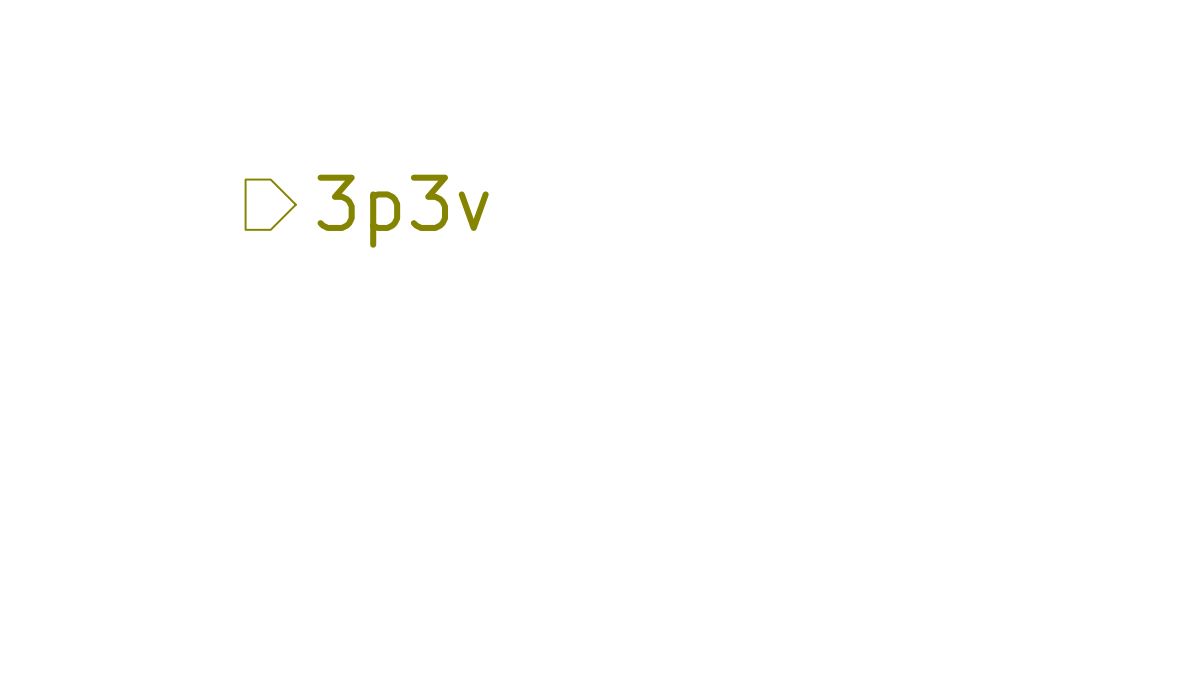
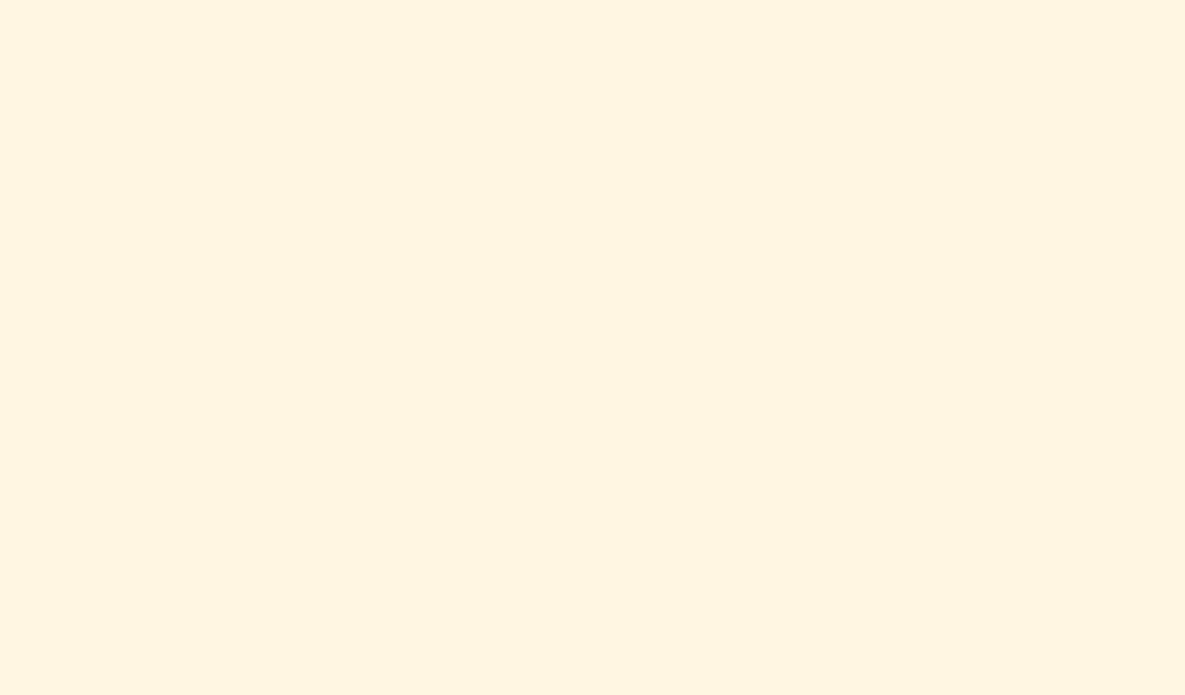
hierarchical label: 3p3v (403, 211) -> none

